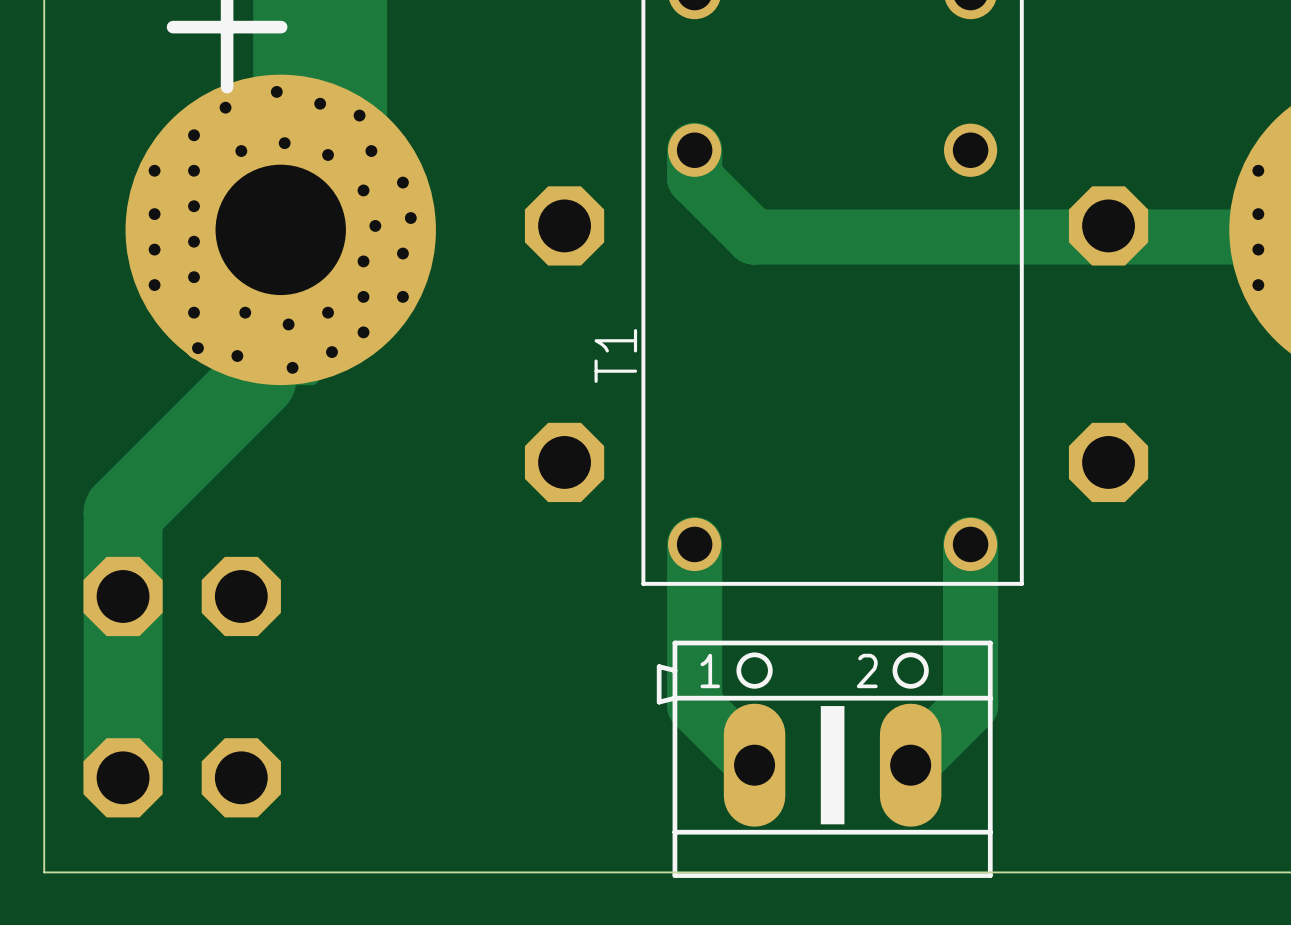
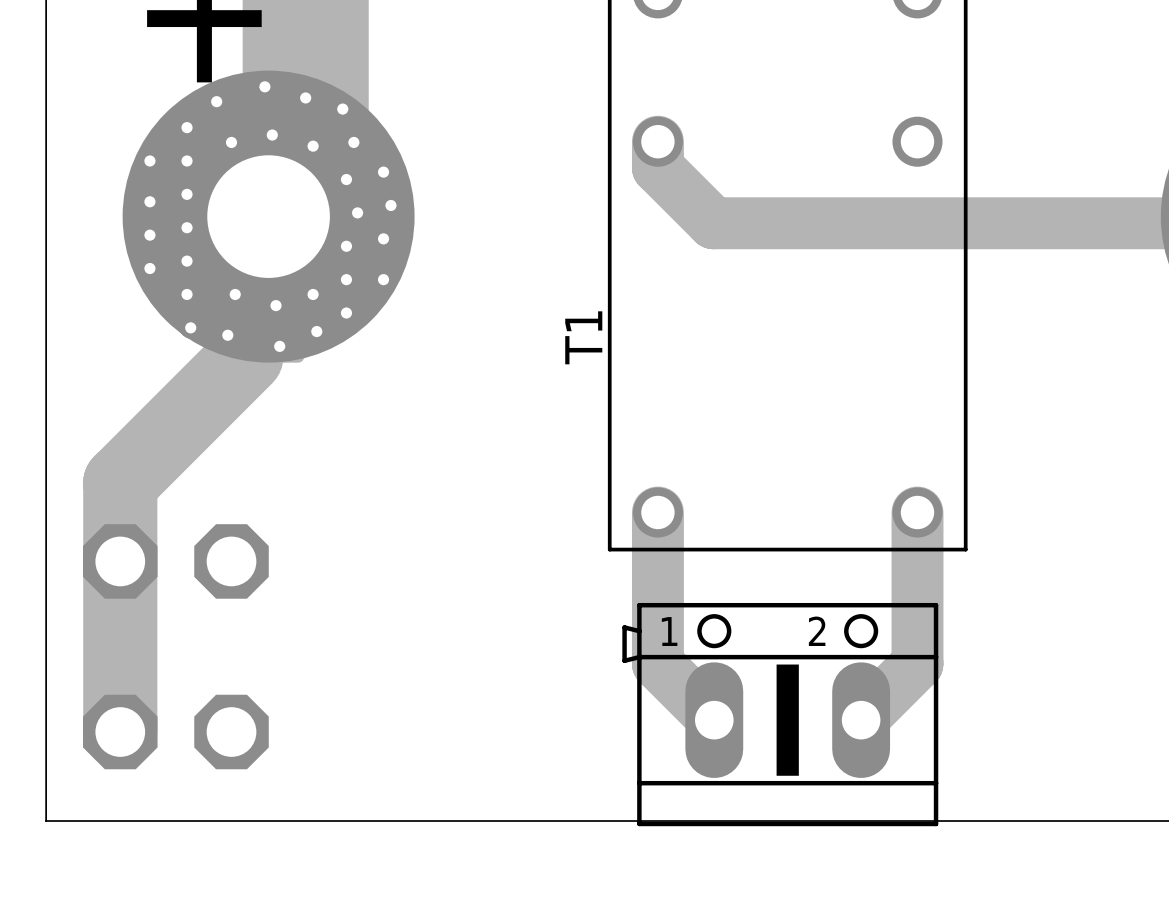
part: (564, 225) -> none
part: (1108, 225) -> none
part: (564, 462) -> none
part: (1108, 462) -> none

